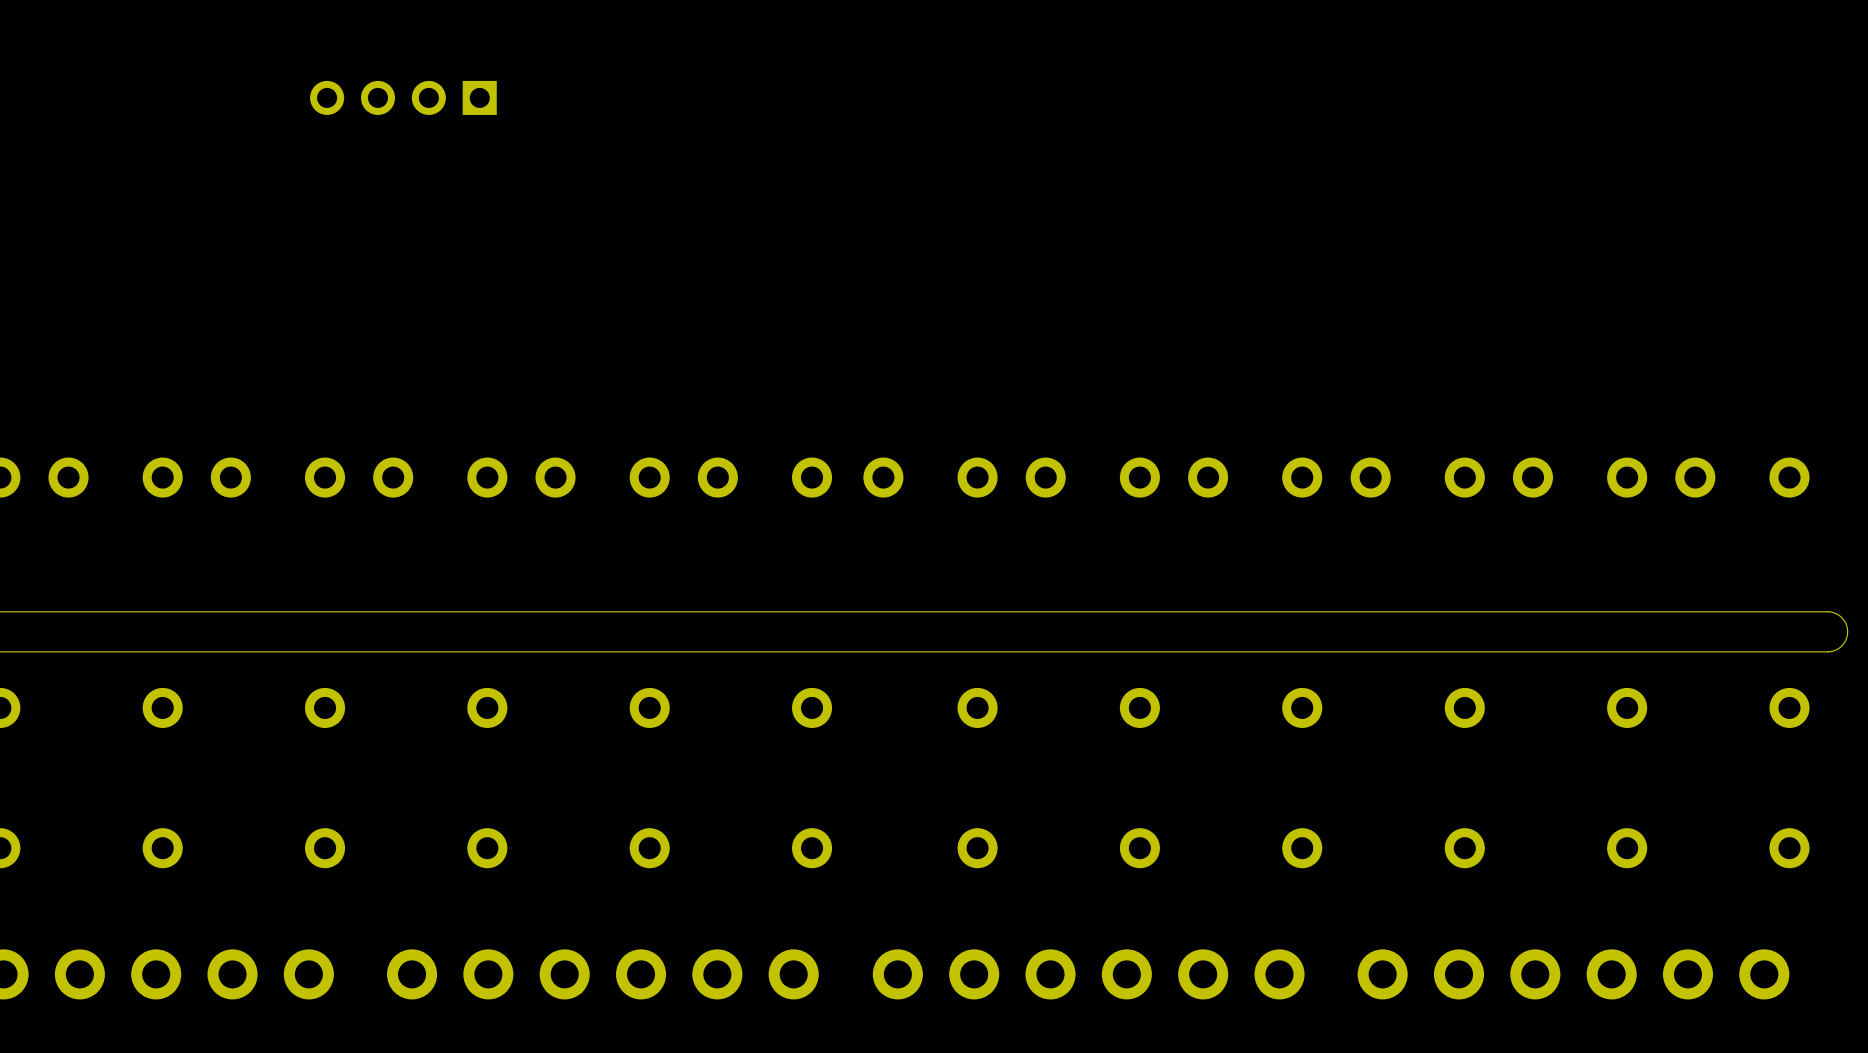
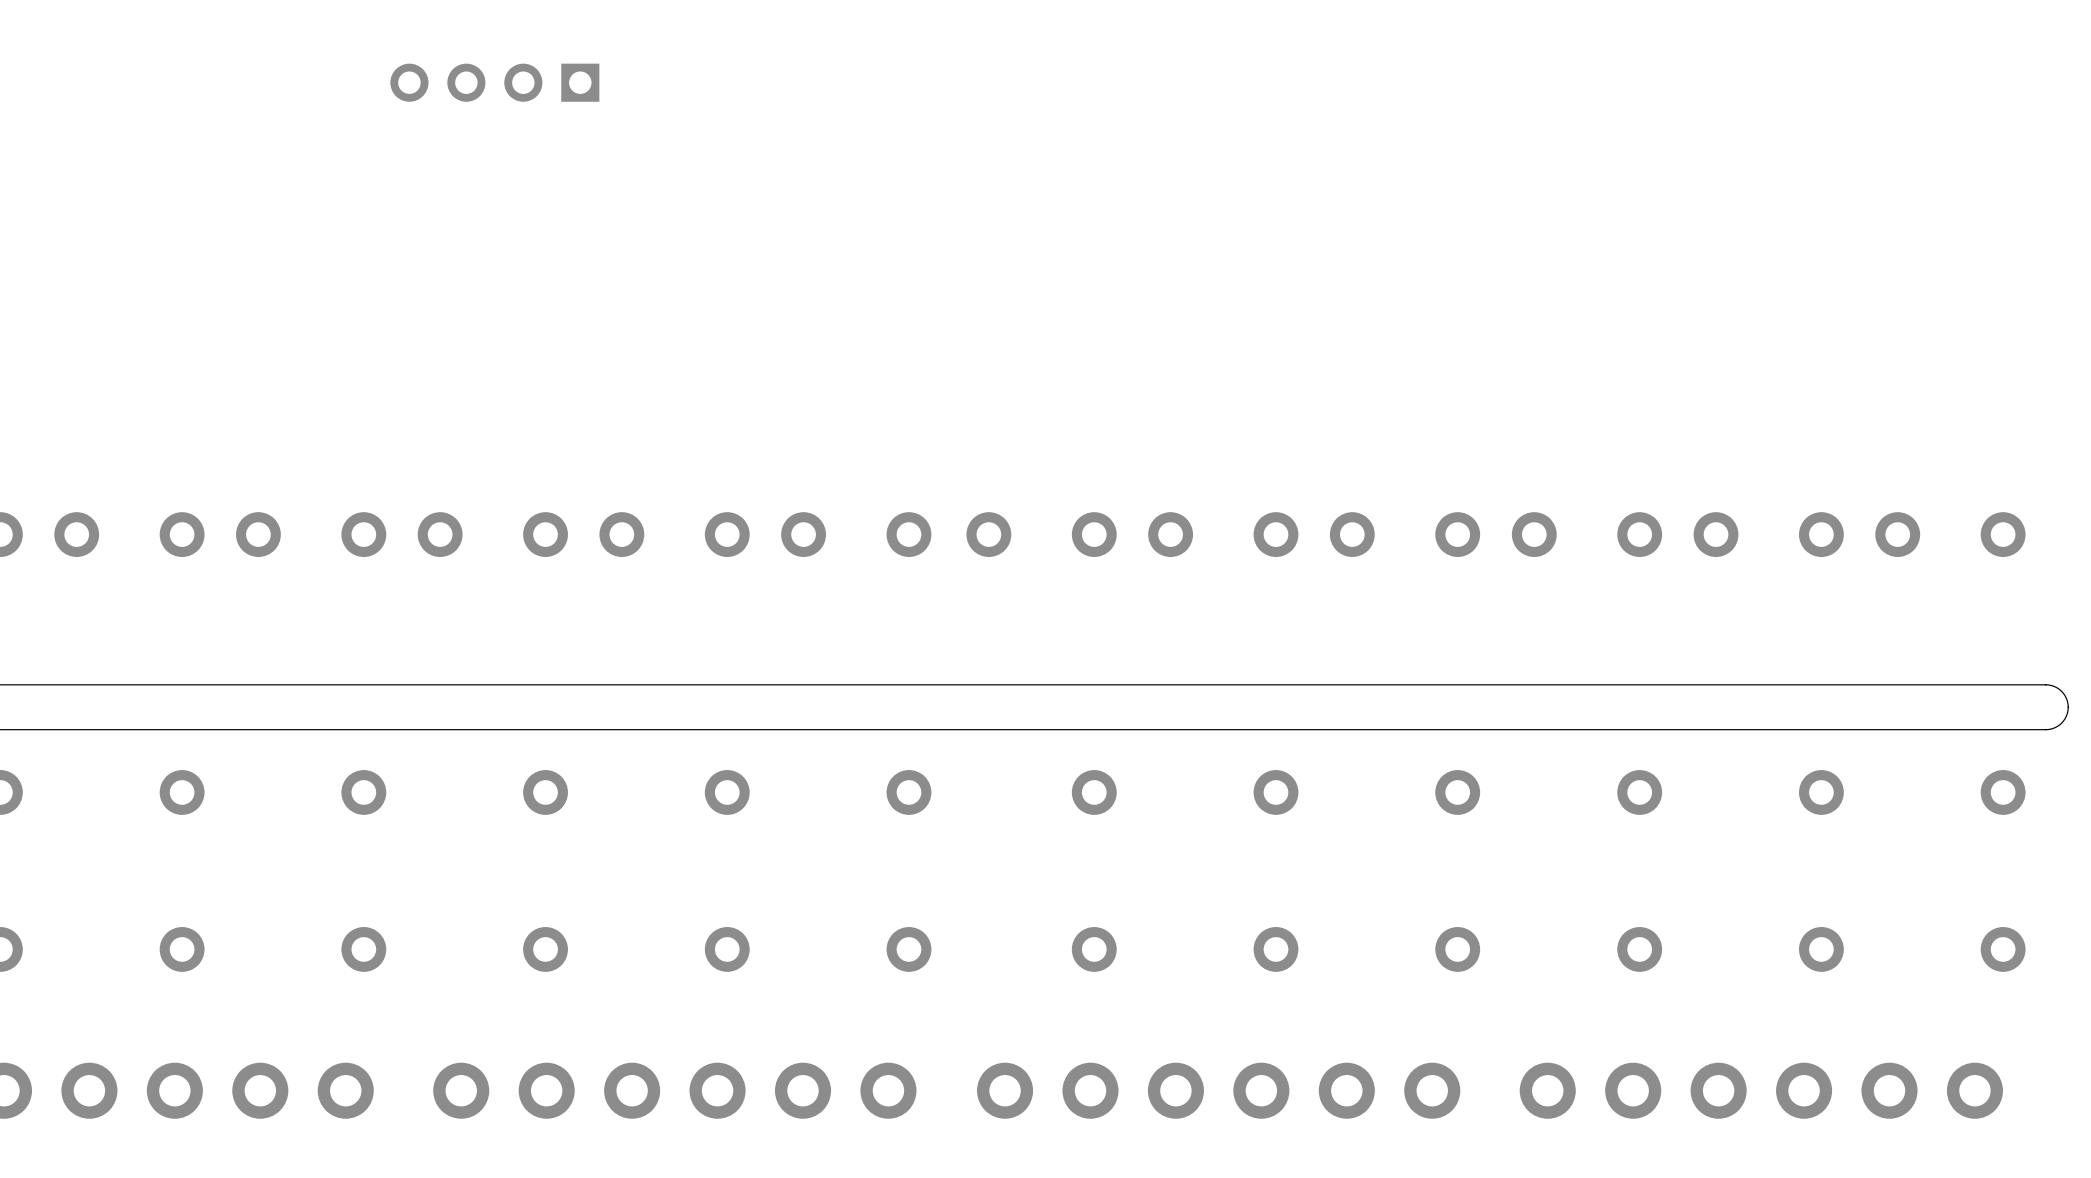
part position: (403, 97) -> (494, 82)

